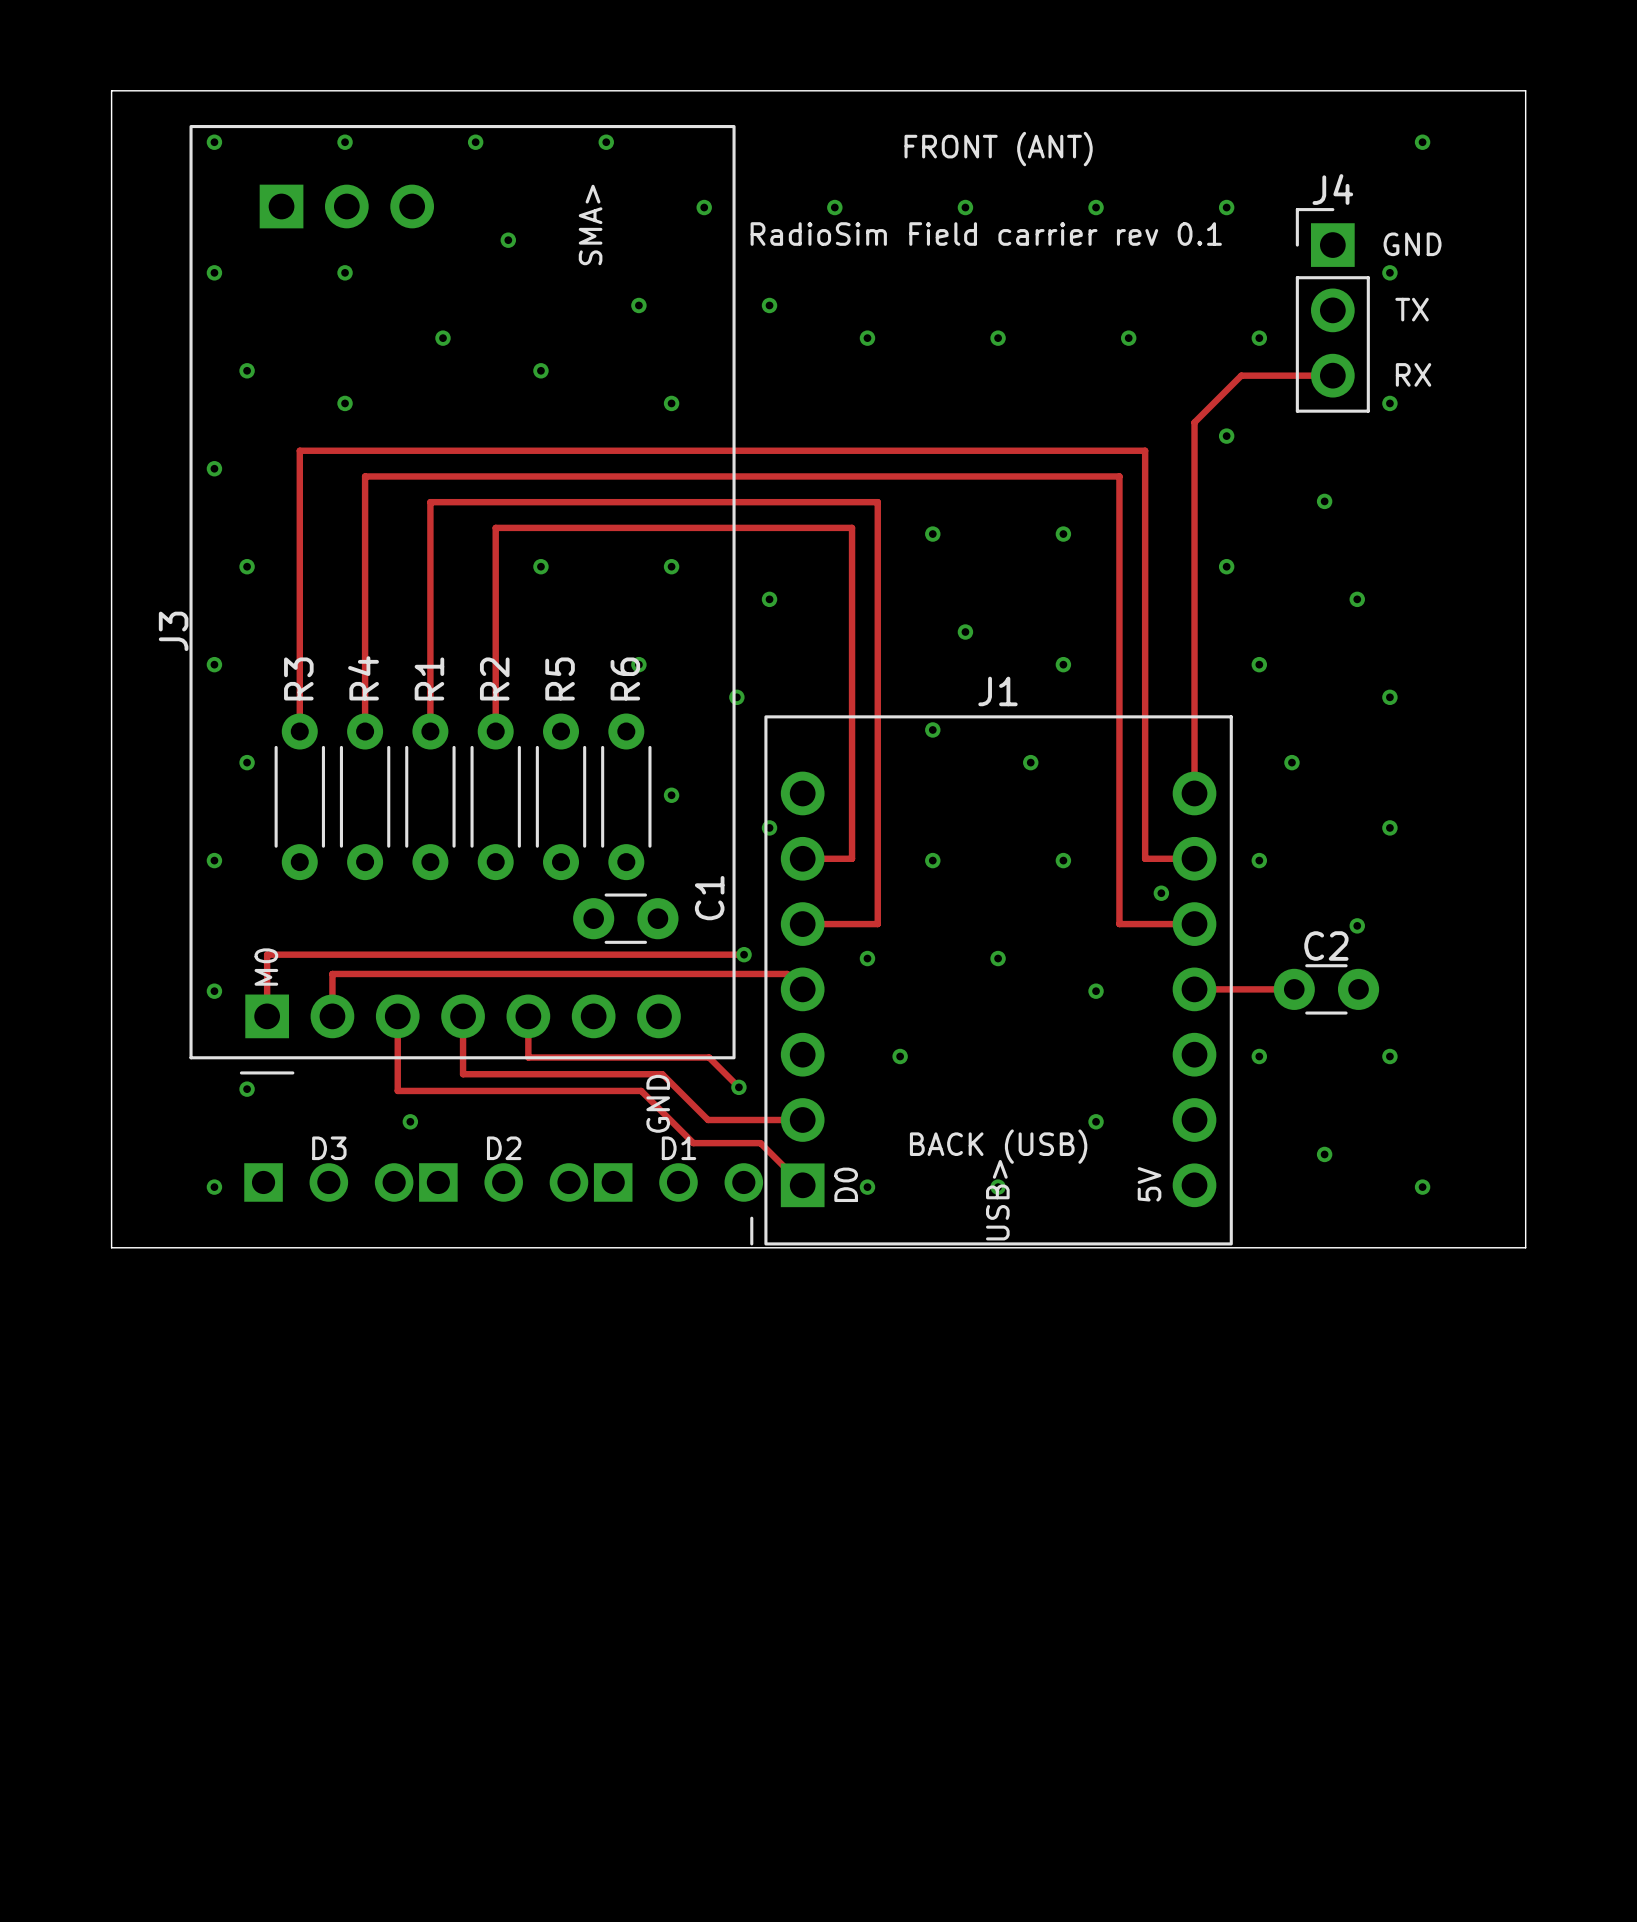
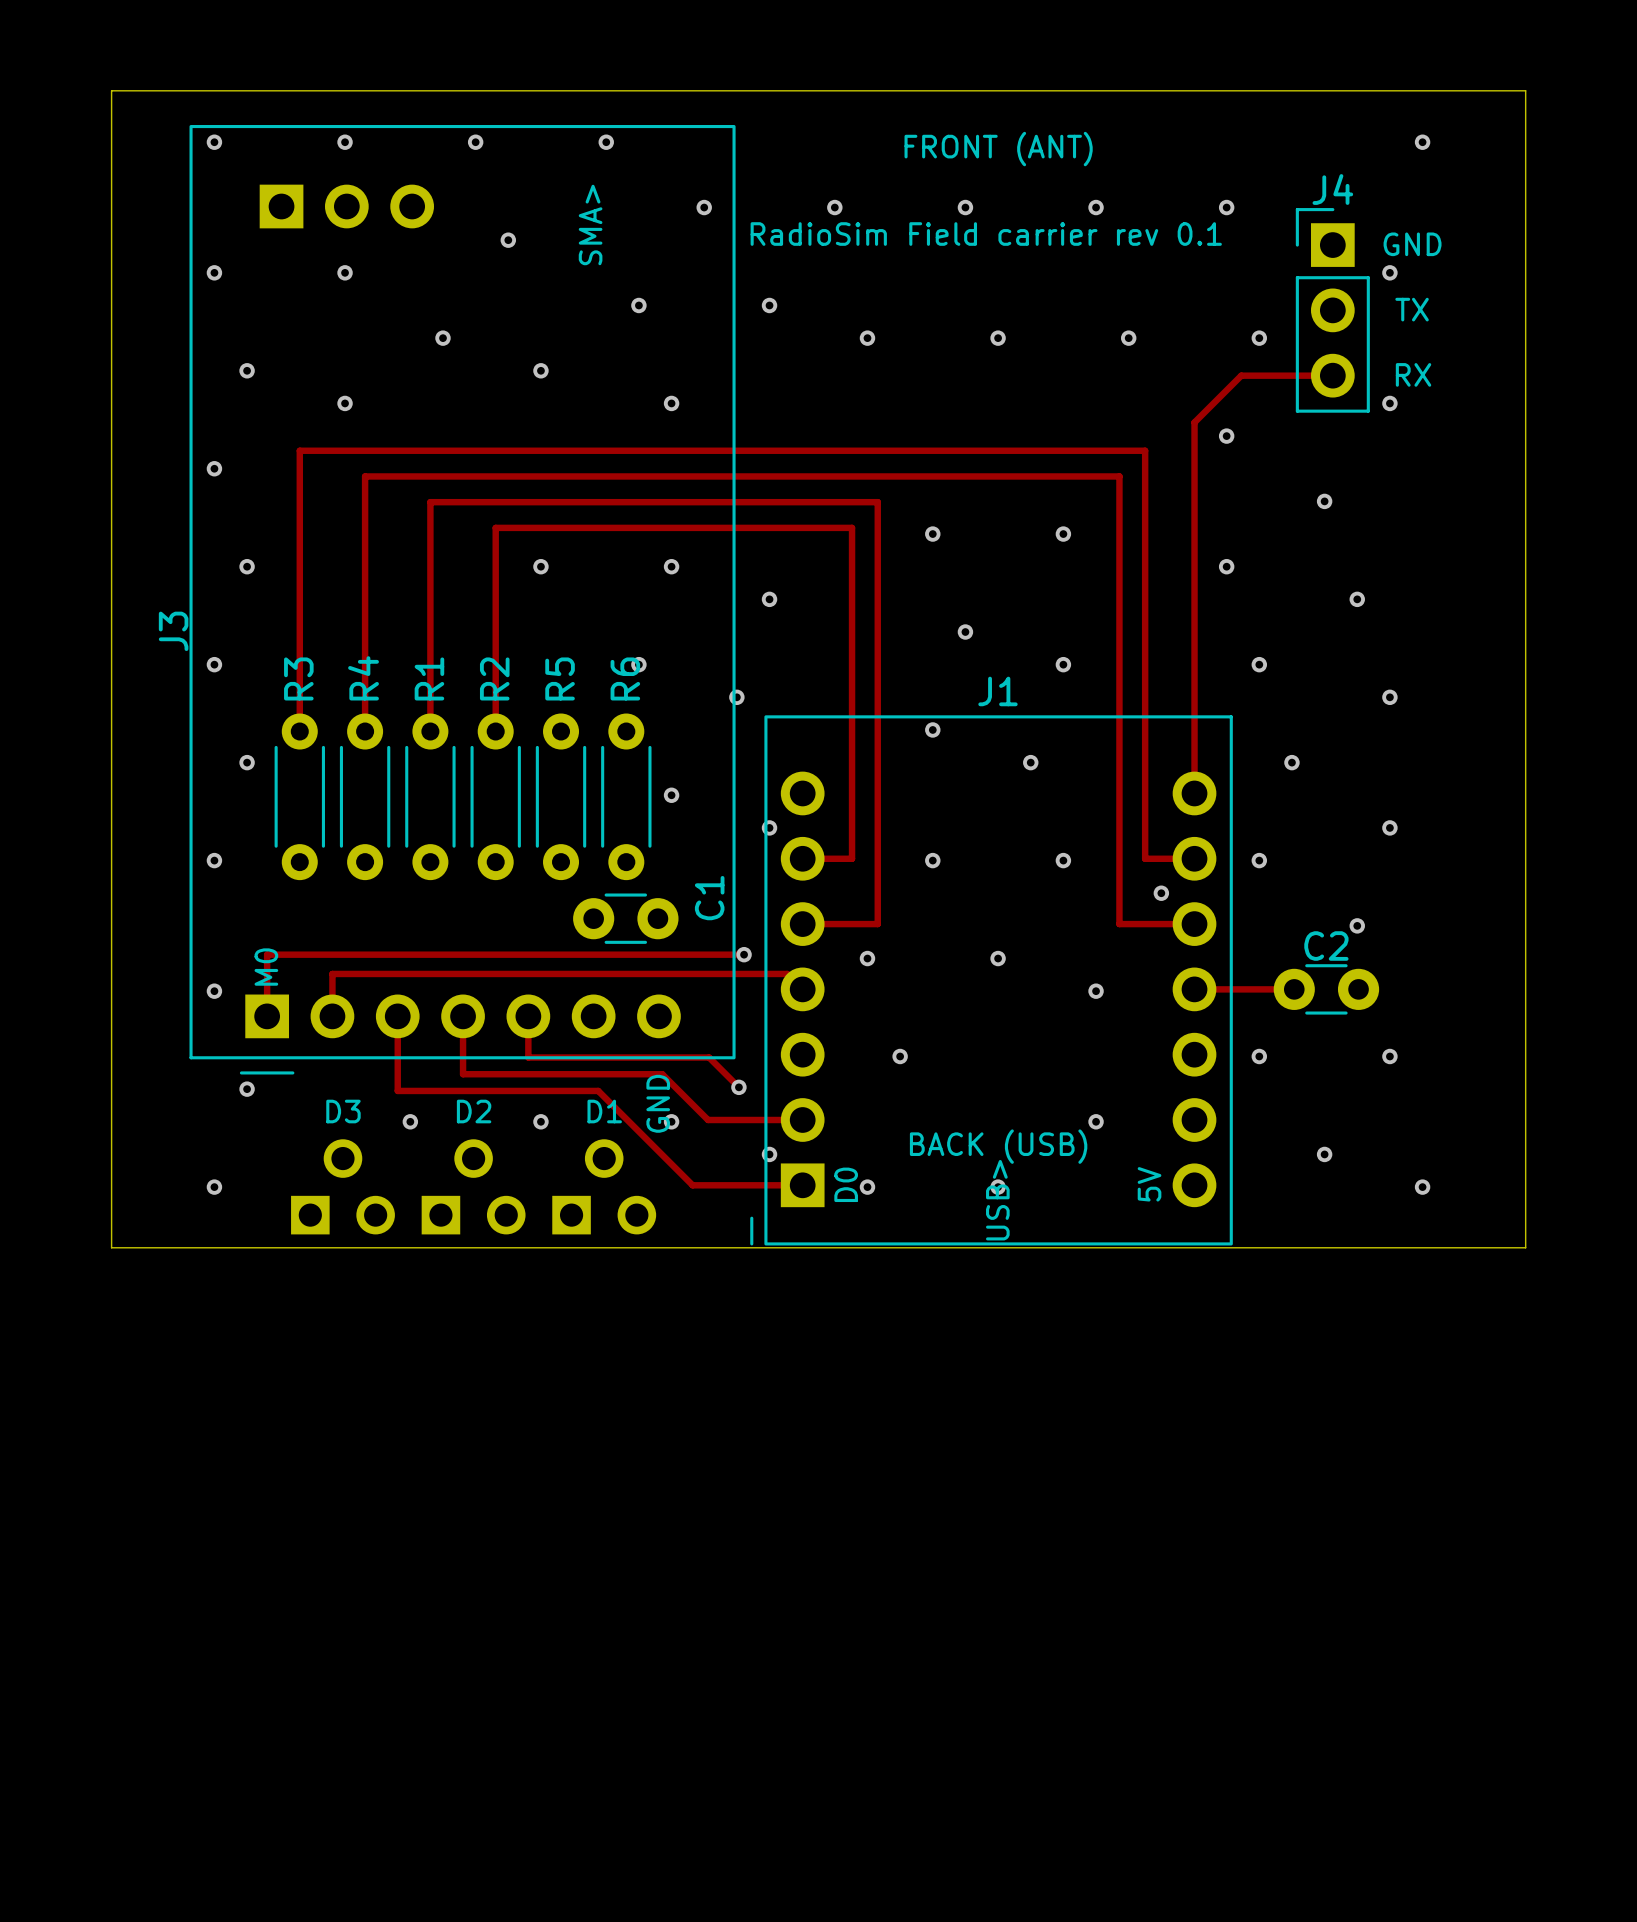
track: (598, 1090) (641, 1090) (693, 1143) (760, 1143) (802, 1185) -> (598, 1090) (692, 1185) (802, 1185)
via: none -> (540, 1121)
via: none -> (671, 1121)
via: none -> (769, 1154)
D3 footprint: [244, 1163, 414, 1202] -> [291, 1139, 395, 1235]
D2 footprint: [419, 1163, 589, 1202] -> [421, 1139, 526, 1235]
D1 footprint: [593, 1163, 764, 1202] -> [552, 1139, 657, 1235]

